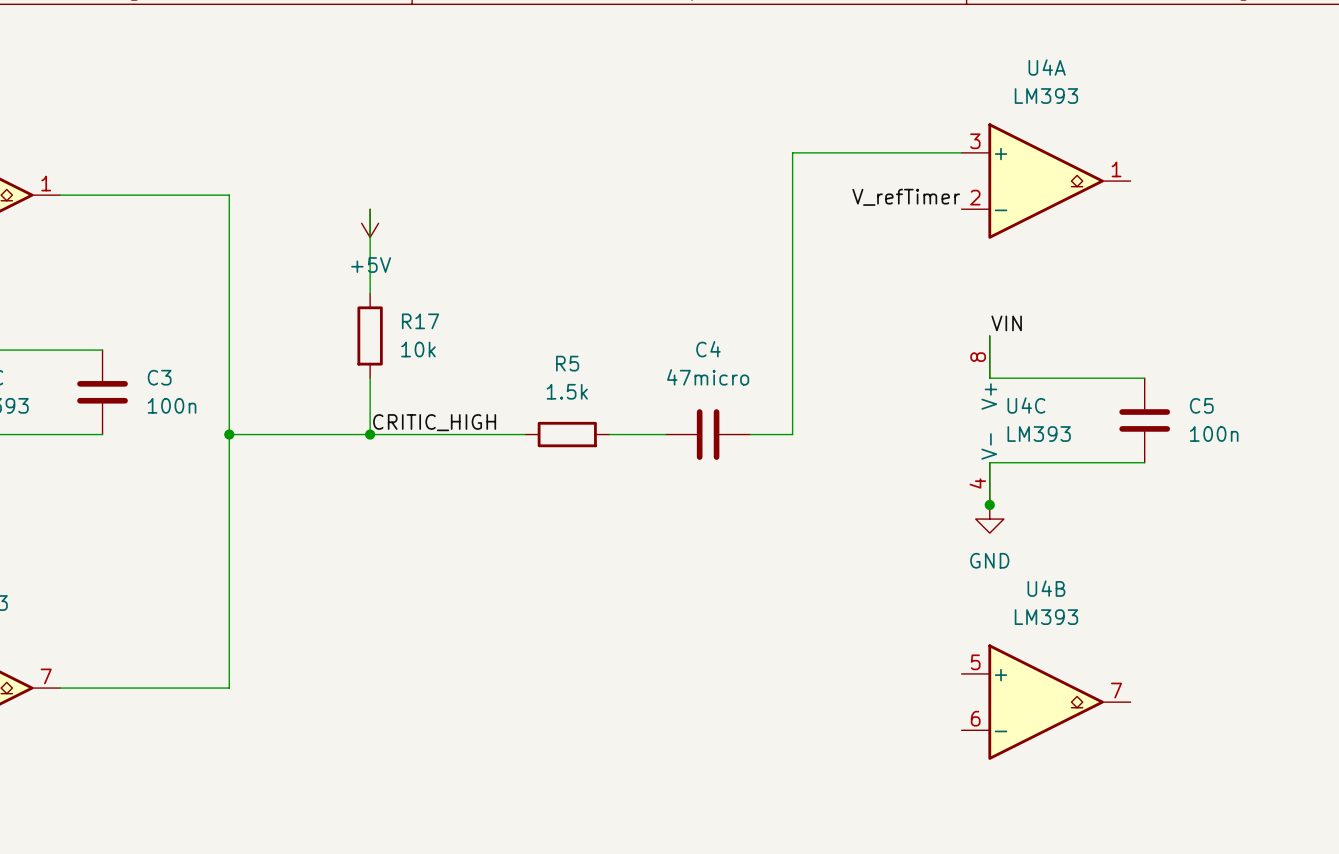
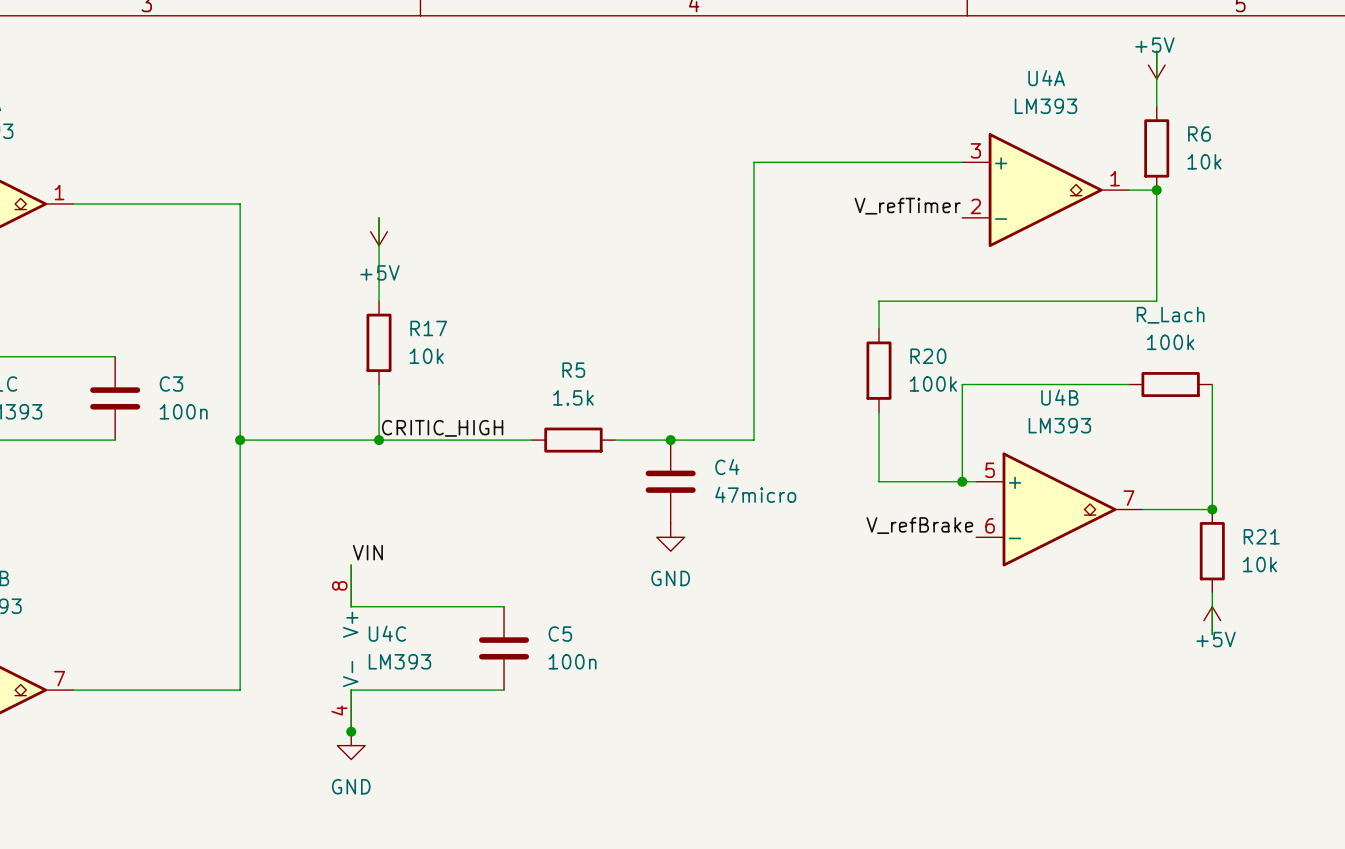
wire: none -> (1156, 51) (1156, 106)
power symbol: none -> +5V (1156, 65)
R6: none -> 10k (1156, 148)
wire: (792, 152) (792, 434) (750, 434) -> (795, 162) (754, 162) (754, 440) (670, 440)
wire: none -> (1128, 190) (1156, 190) (1156, 301) (878, 301) (878, 328)
junction: none -> (1156, 190)
label: VIN (1006, 323) -> none
wire: (989, 335) (989, 378) -> (962, 481) (962, 384) (990, 384)
C4 name position: C4 (708, 349) -> C4 (727, 467)
R20: none -> 100k (878, 370)
C4 value position: 47micro (708, 377) -> 47micro (755, 494)
R_Lach: none -> 100k (1170, 384)
wire: none -> (1212, 384) (1212, 509) (1142, 509)
wire: none -> (878, 412) (878, 481) (976, 481)
U4C position: (989, 420) -> (351, 648)
C5 position: (1144, 420) -> (504, 648)
junction: none -> (670, 440)
C4 rotation: 0° (708, 434) -> 90° clockwise (670, 481)
C4 position: (708, 434) -> (670, 481)
wire: (1144, 462) (989, 462) (989, 504) -> none
junction position: (989, 504) -> (962, 481)
junction: none -> (1212, 509)
power symbol: GND (989, 519) -> none
label: none -> V_refBrake (919, 525)
power symbol: none -> GND (670, 537)
R21: none -> 10k (1212, 551)
label: none -> VIN (367, 552)
wire: none -> (351, 565) (351, 606) (504, 606)
wire: none -> (1212, 592) (1212, 634)
power symbol: none -> +5V (1212, 620)
wire: none -> (504, 690) (351, 690) (351, 731)
U4B position: (1046, 702) -> (1059, 509)
junction: none -> (351, 731)
power symbol: none -> GND (351, 745)

